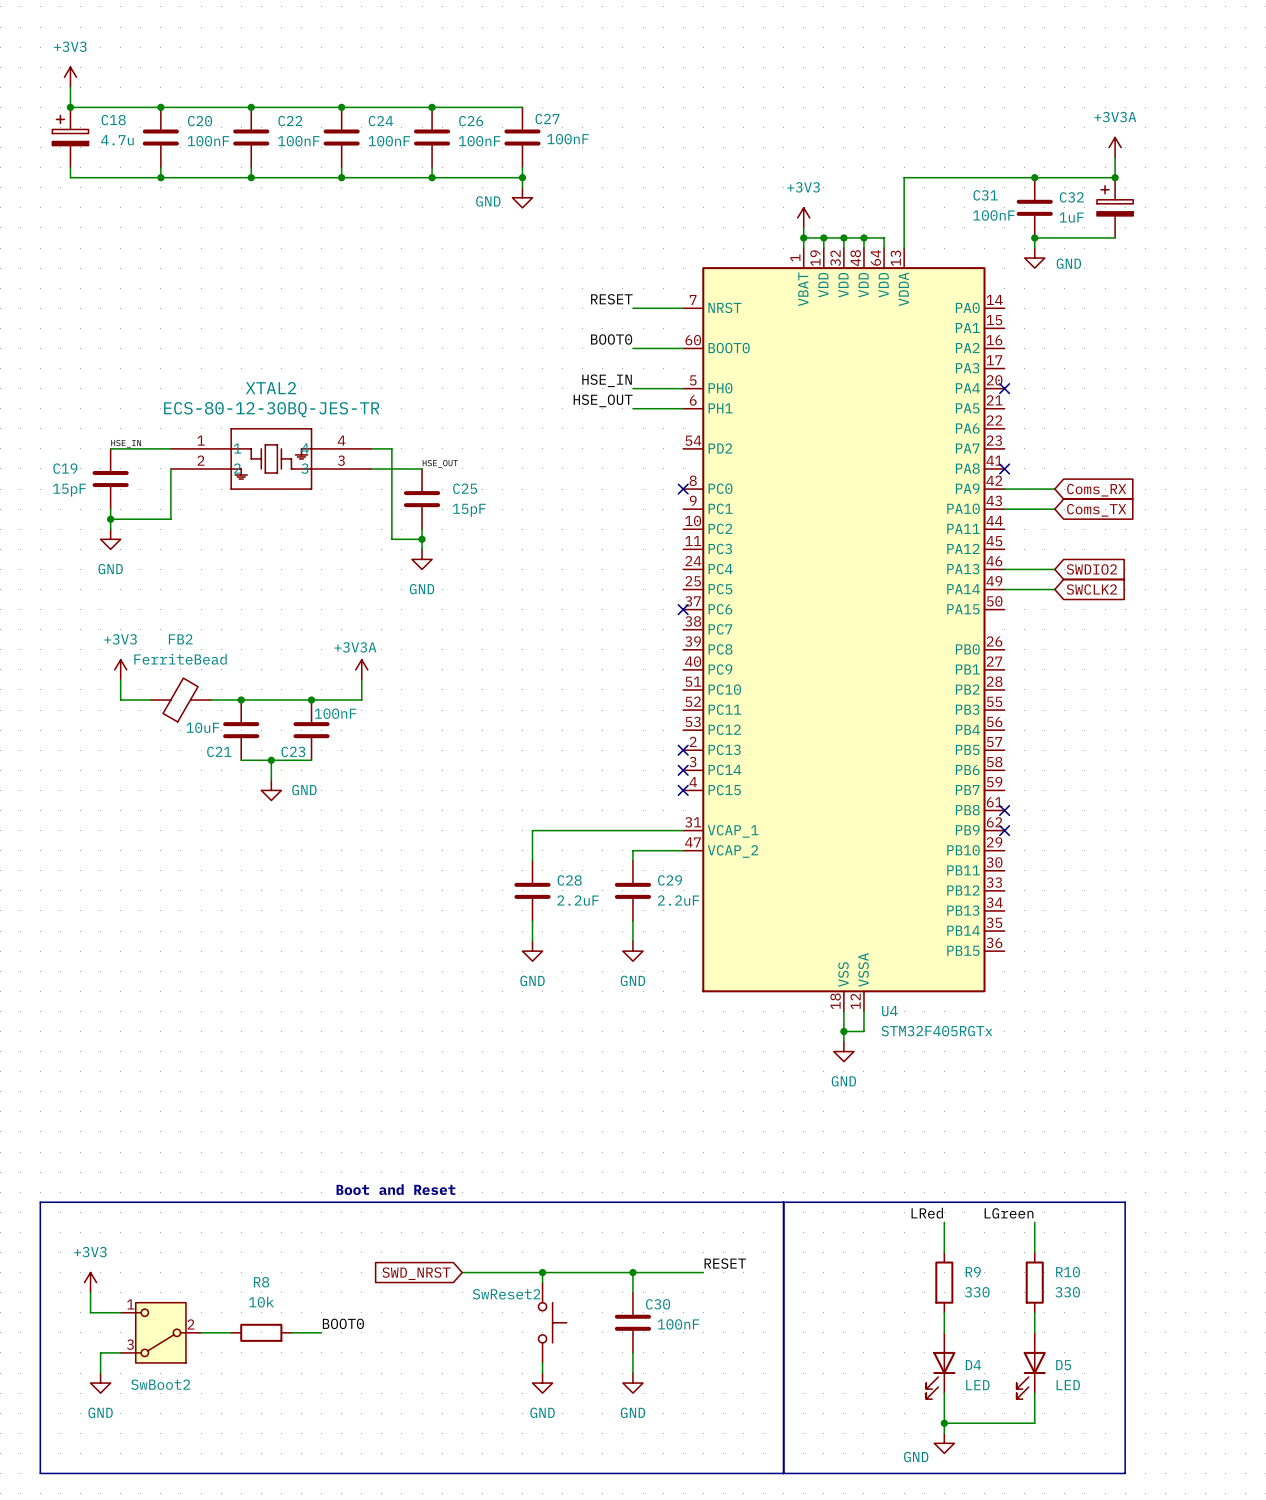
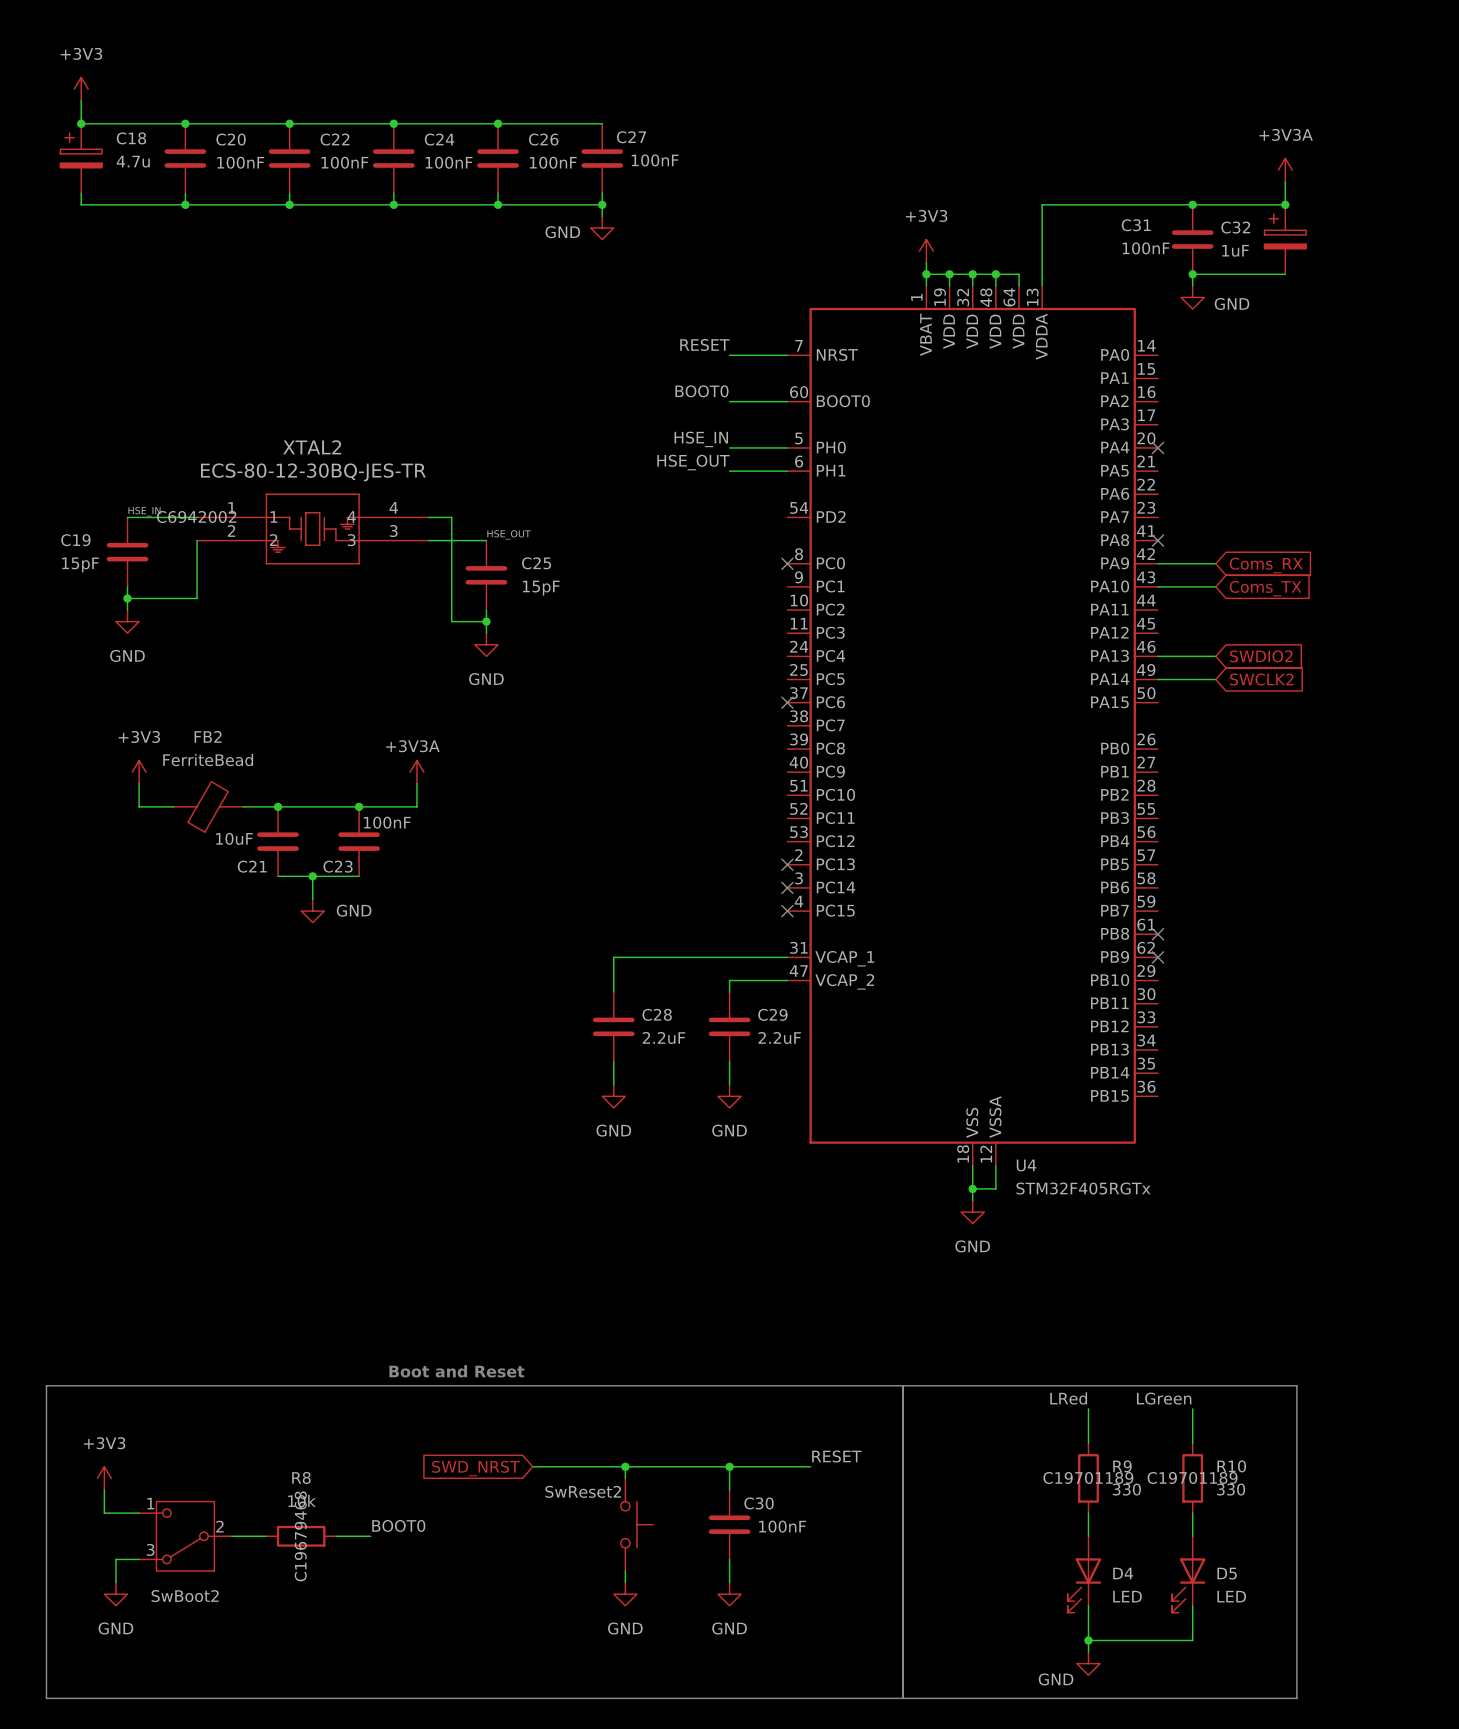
XTAL2 text: none -> C6942002 (196, 517)
R9 text: none -> C19701189 (1088, 1477)
R10 text: none -> C19701189 (1192, 1477)
R8 text: none -> C19679468 (300, 1536)

